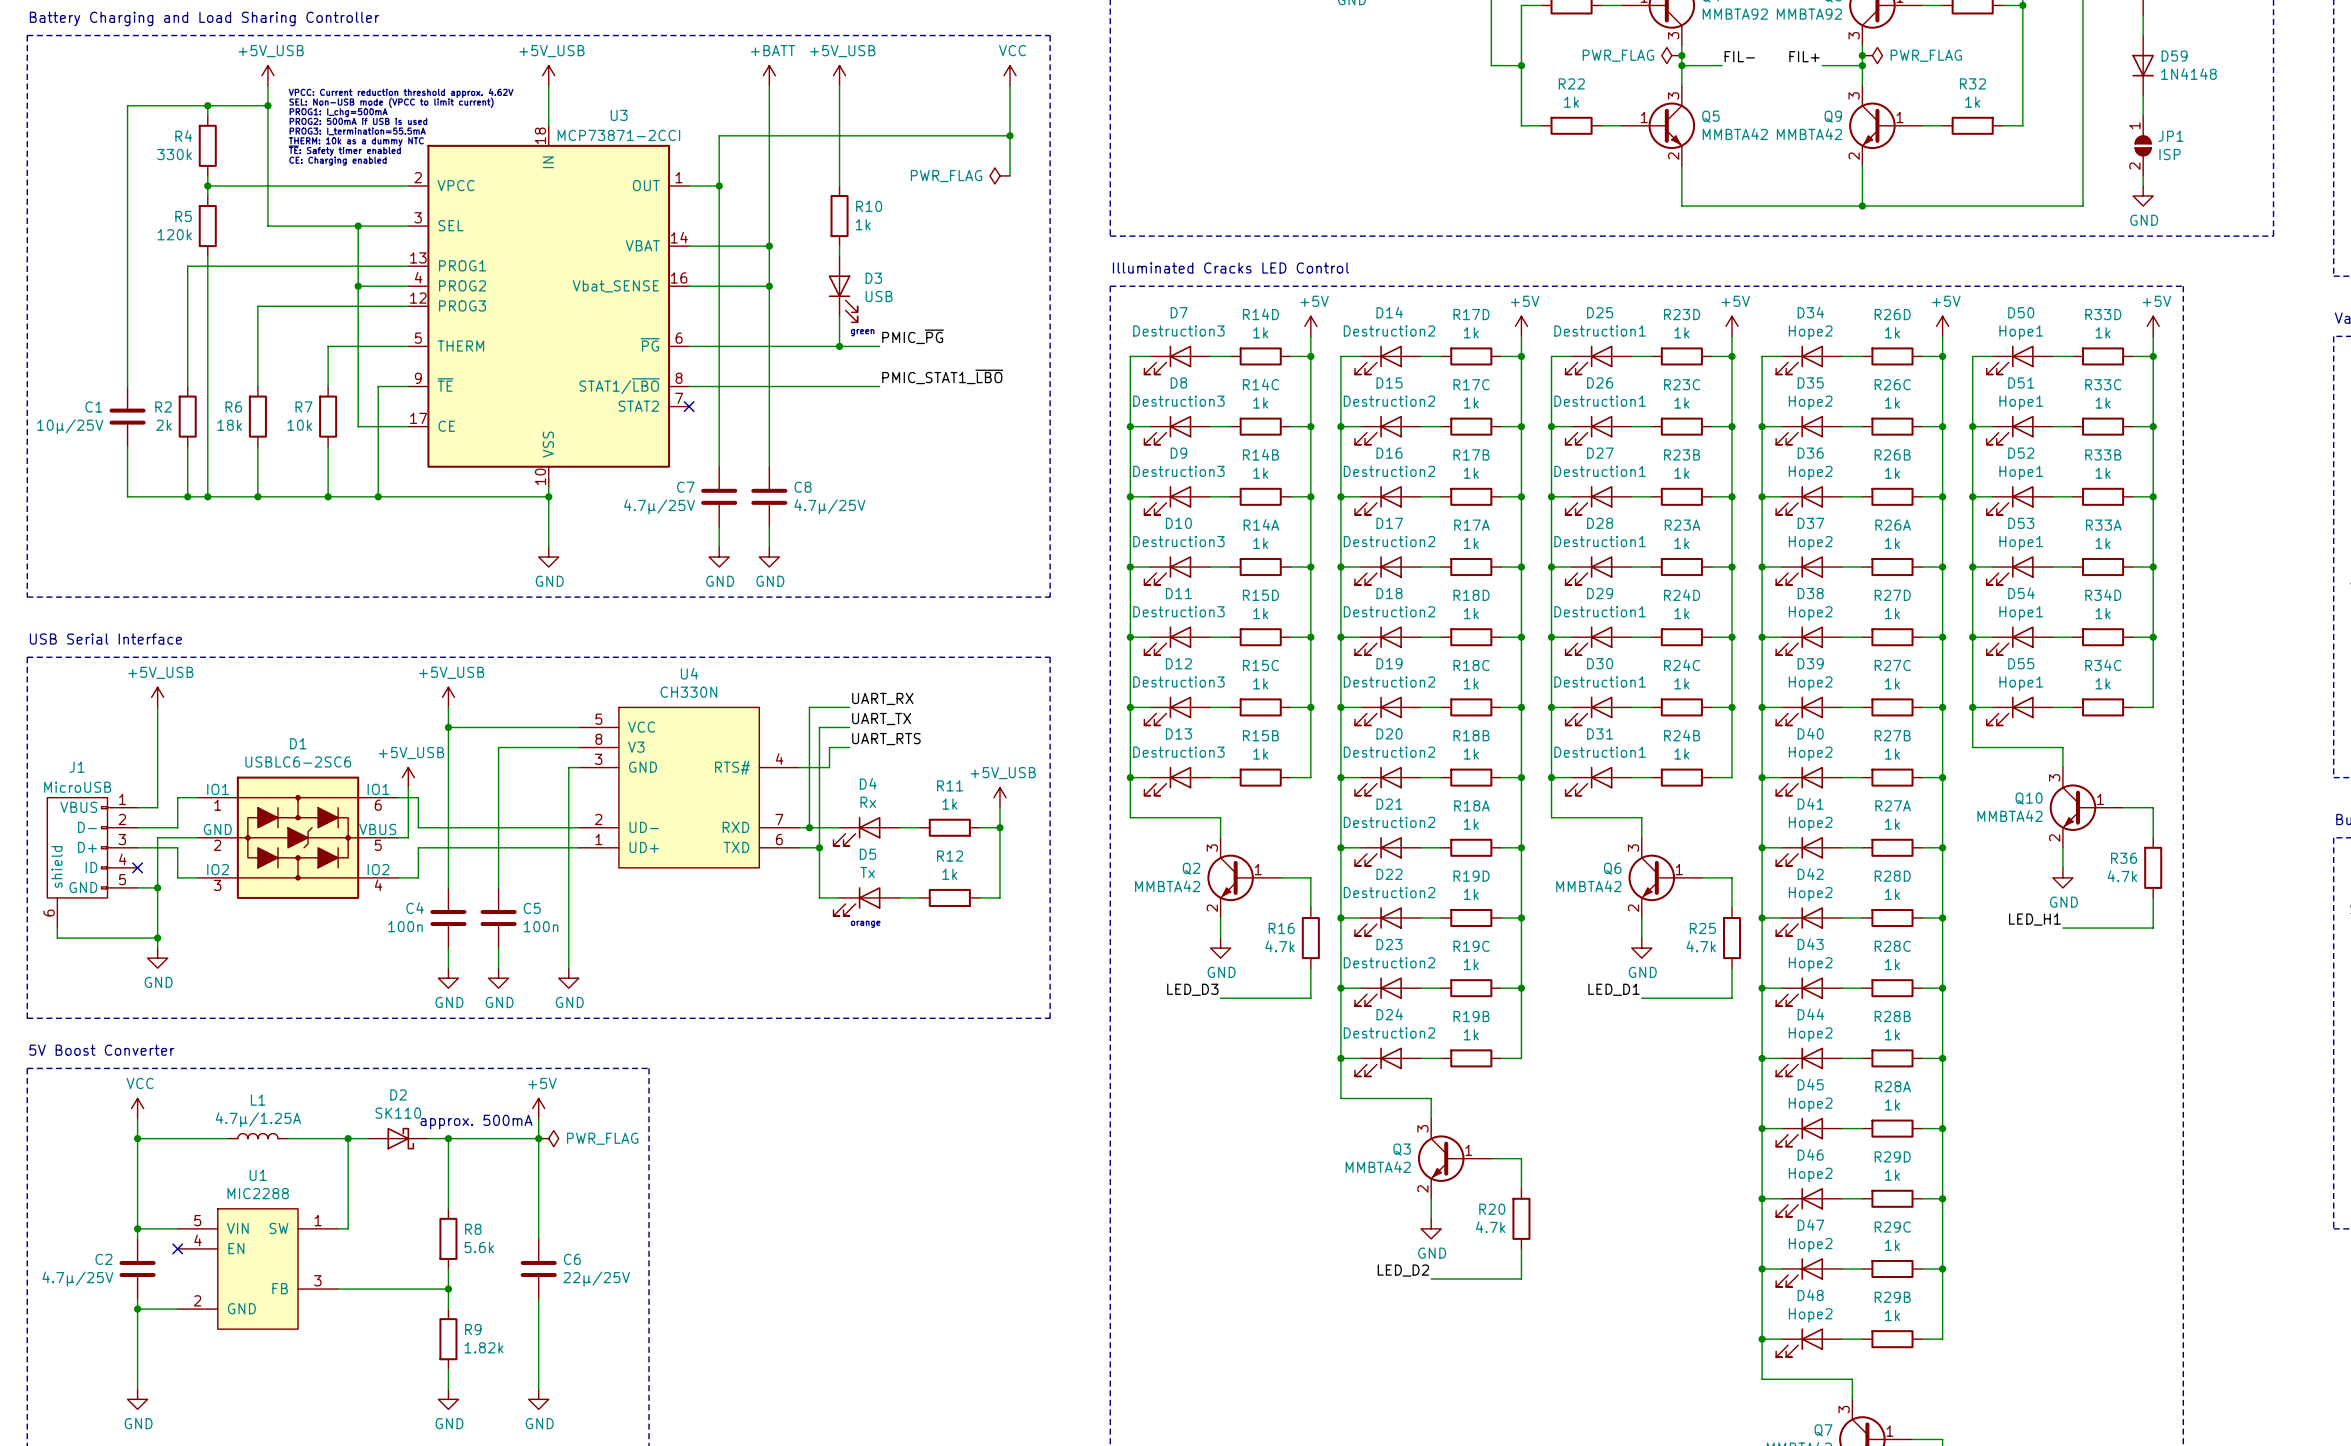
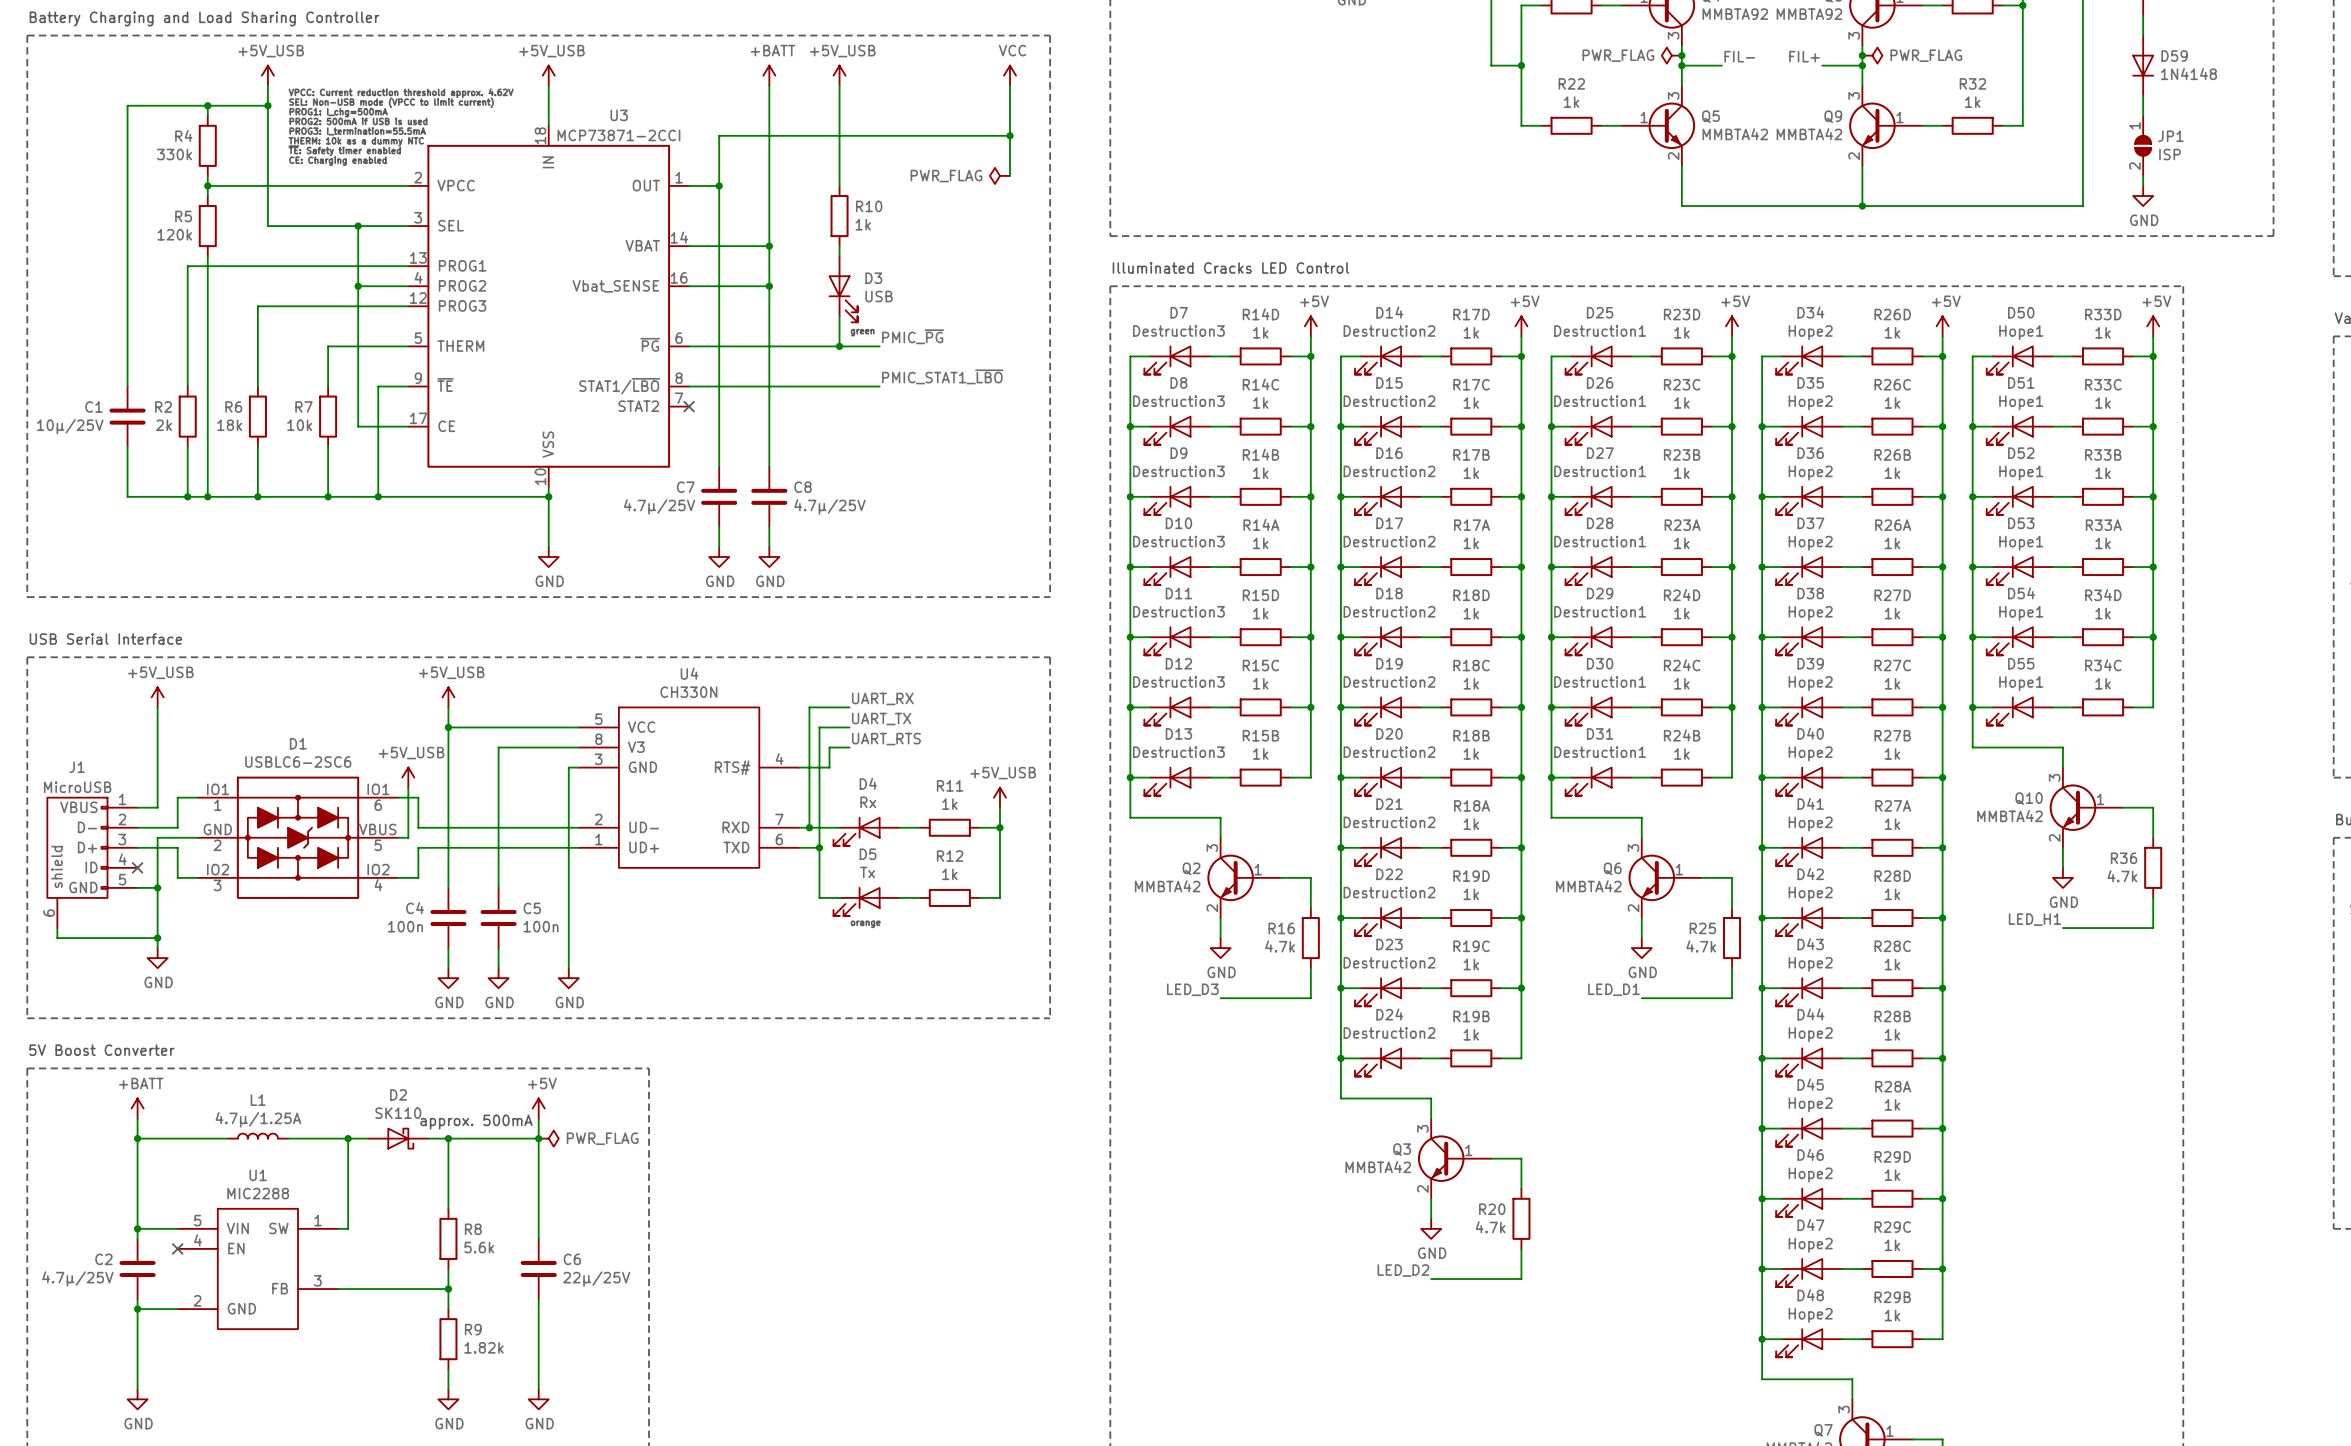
power symbol: VCC (137, 1108) -> +BATT (137, 1108)

